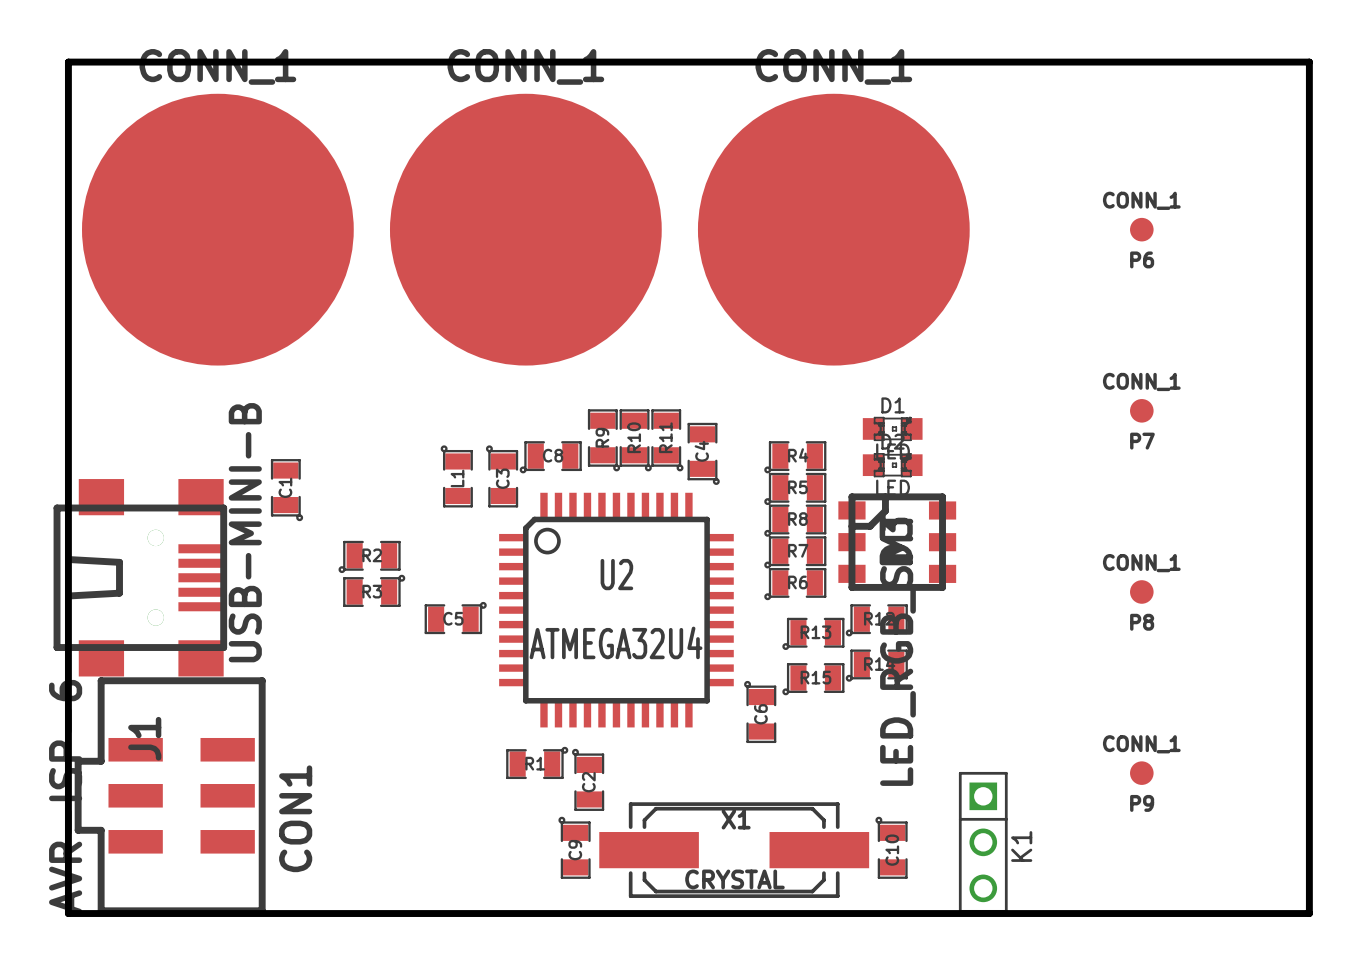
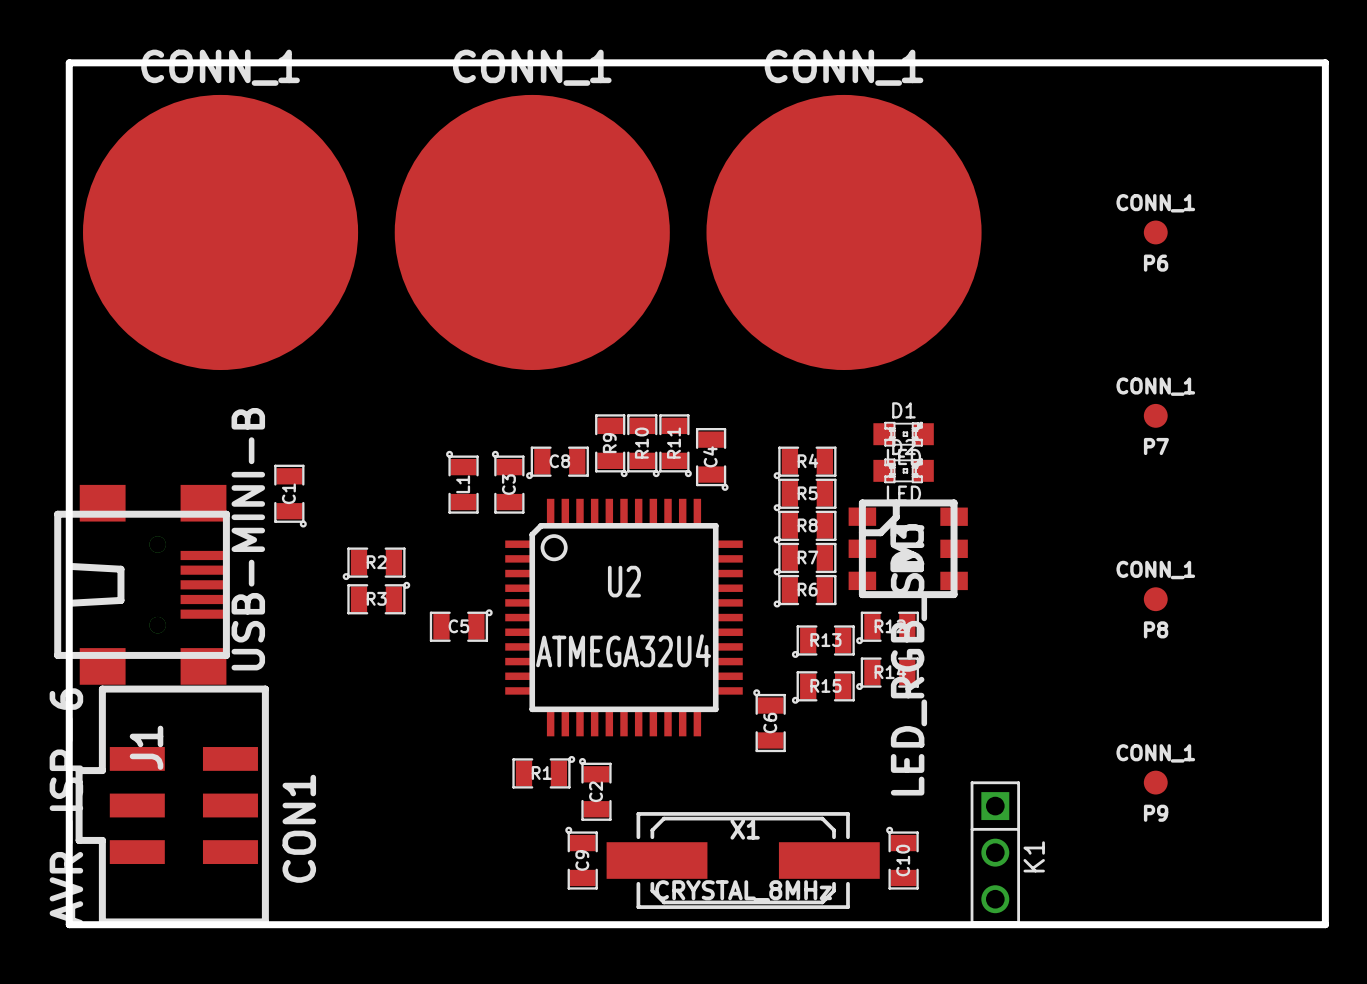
X1 value: CRYSTAL (734, 879) -> CRYSTAL_8MHz (743, 890)

